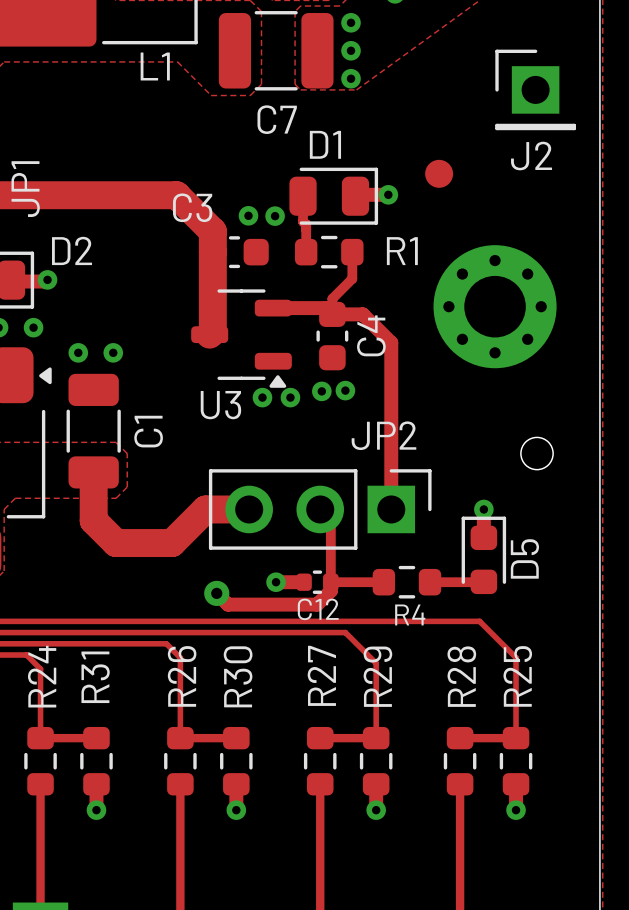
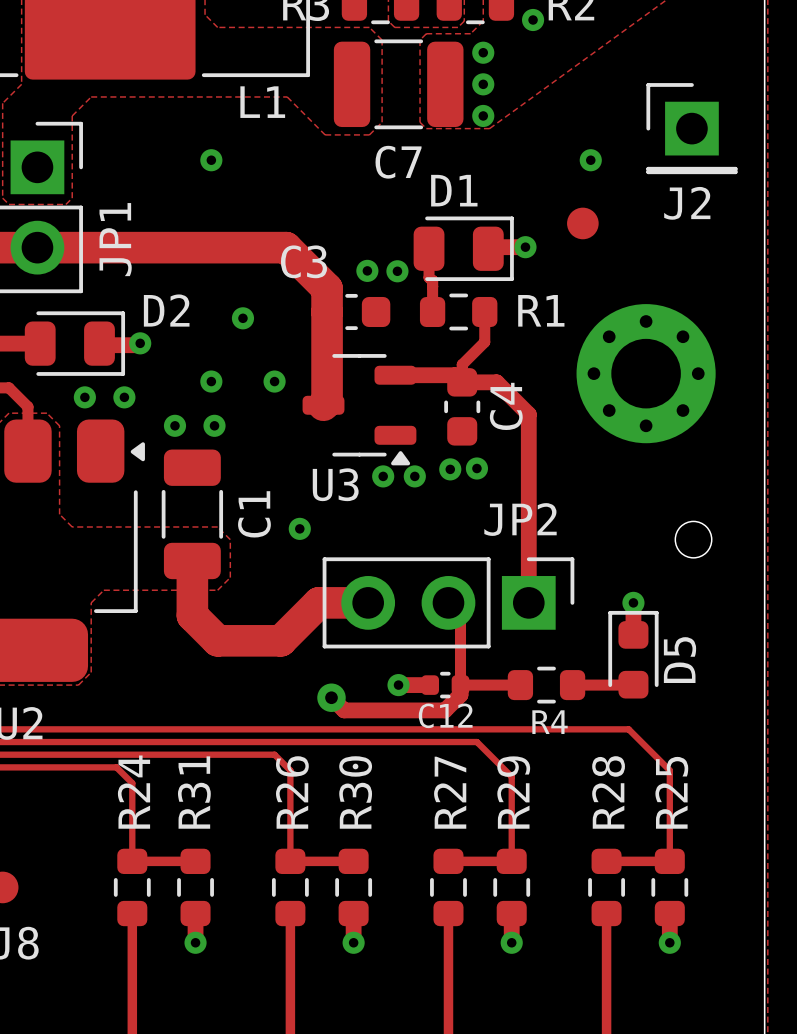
via: none -> (211, 160)
via: none -> (590, 160)
via: none -> (242, 318)
via: none -> (211, 381)
via: none -> (274, 381)
via: none -> (299, 528)

